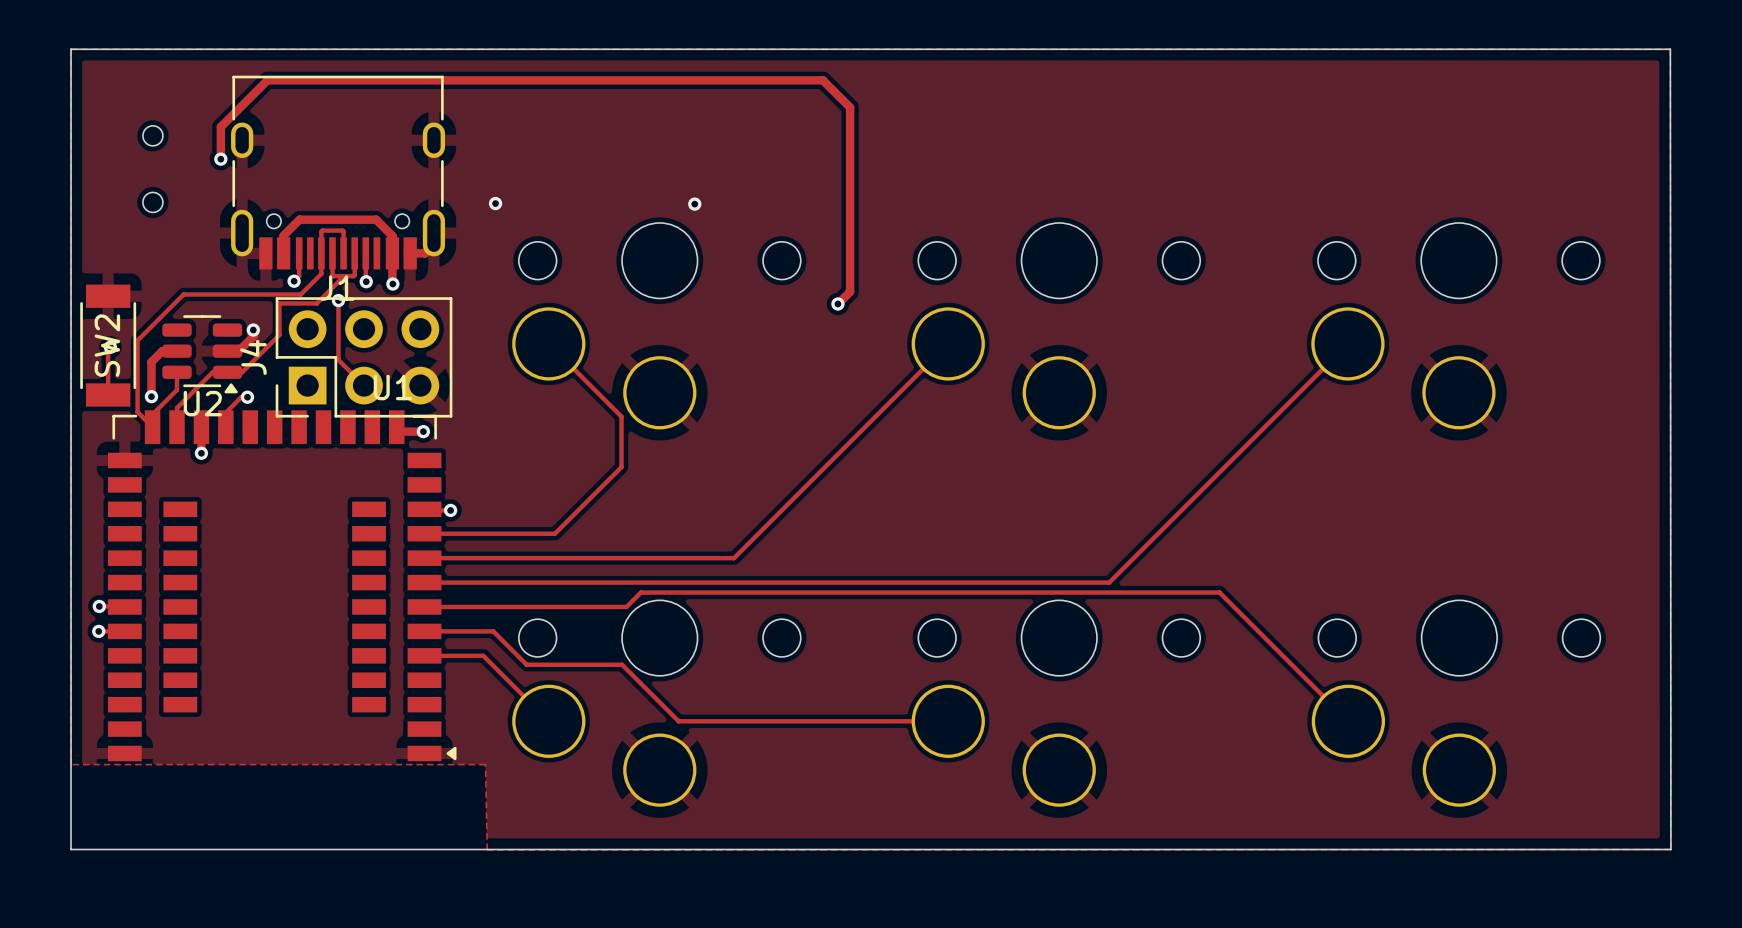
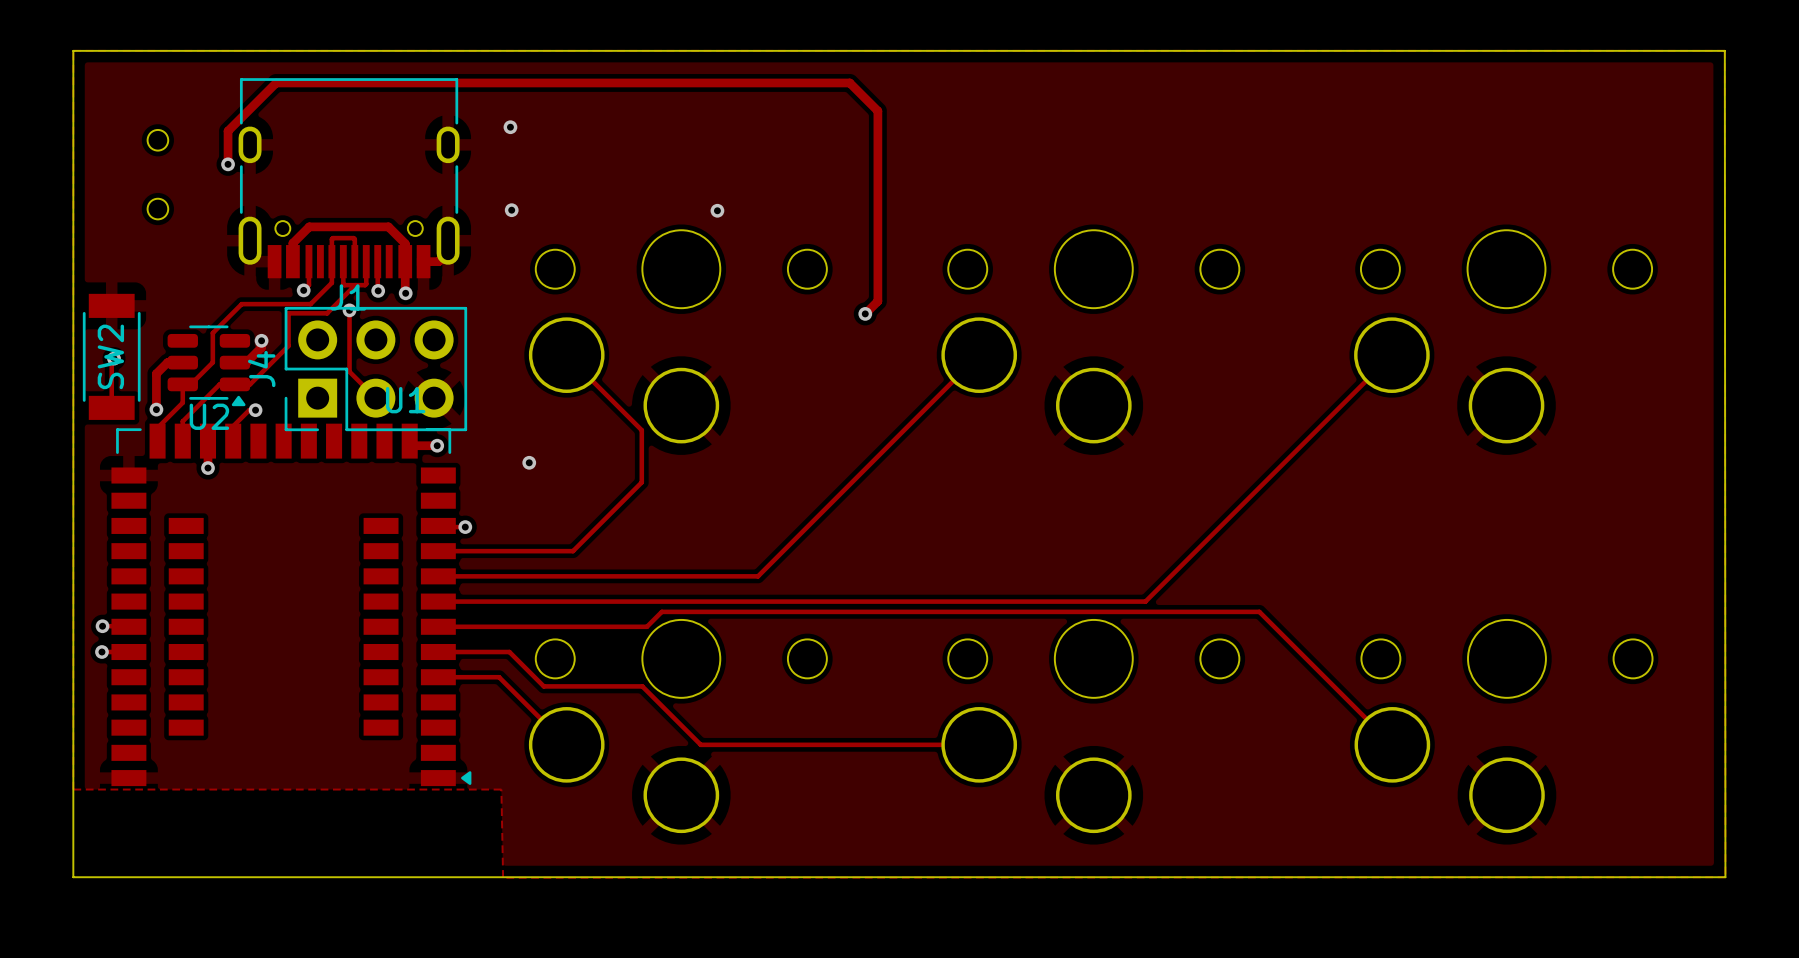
via: none -> (510, 127)
track: (234, 294) (183, 294) (137, 340) (137, 412) (152, 427) -> (241, 304) (212, 333) (212, 362) (190, 384) (182, 384)
via: none -> (529, 462)

